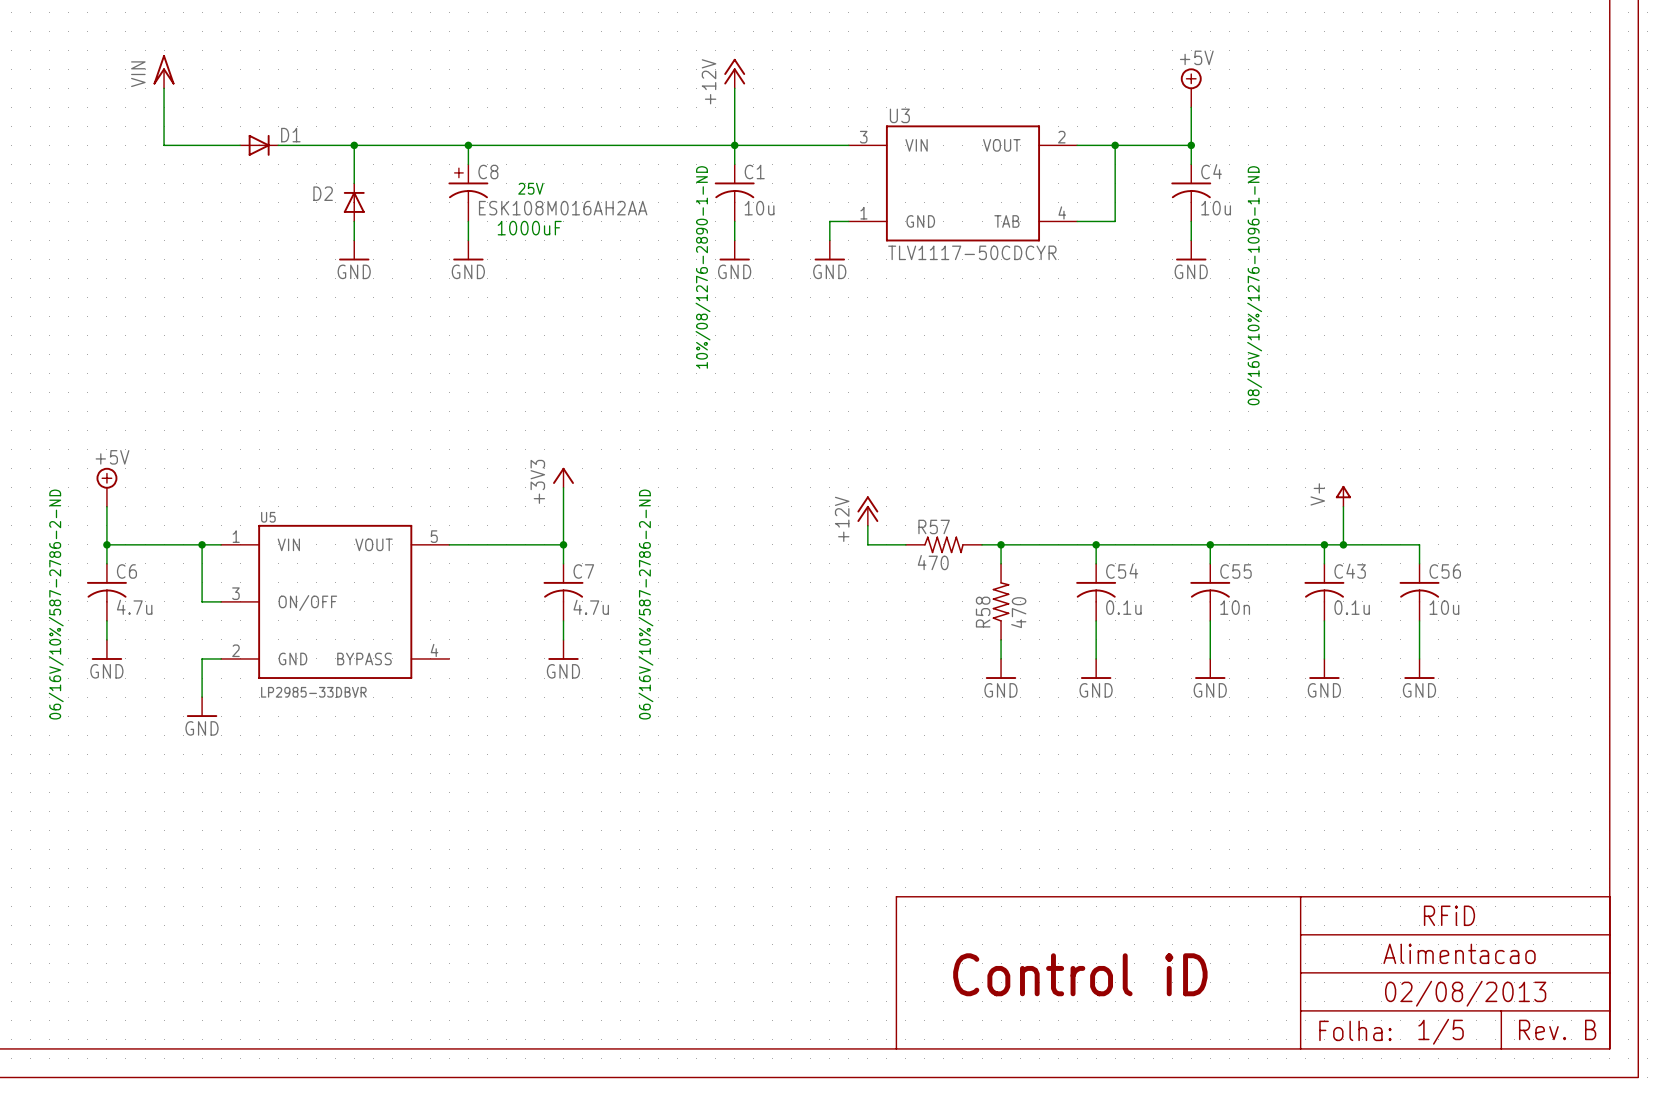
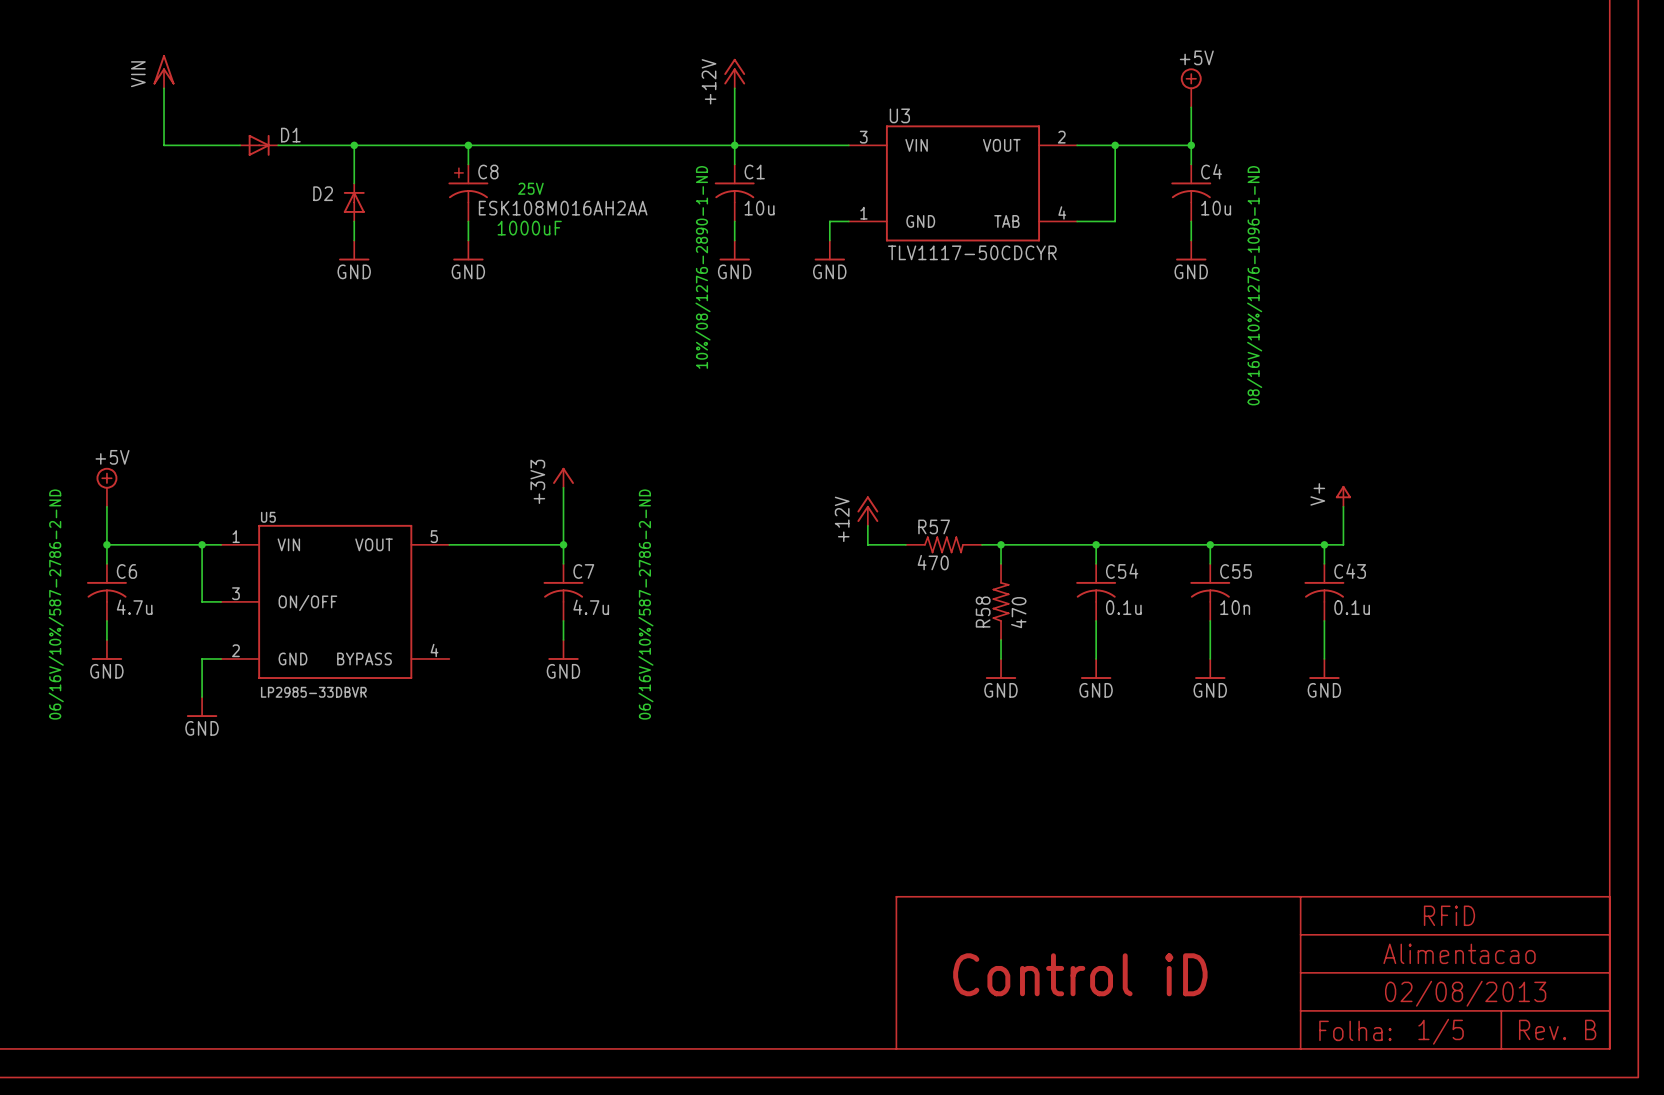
wire: (1343, 544) (1419, 544) (1419, 563) -> none
junction: (1343, 544) -> none
C56: 10u (1419, 592) -> none
wire: (1419, 620) (1419, 658) -> none
power symbol: GND (1419, 668) -> none

